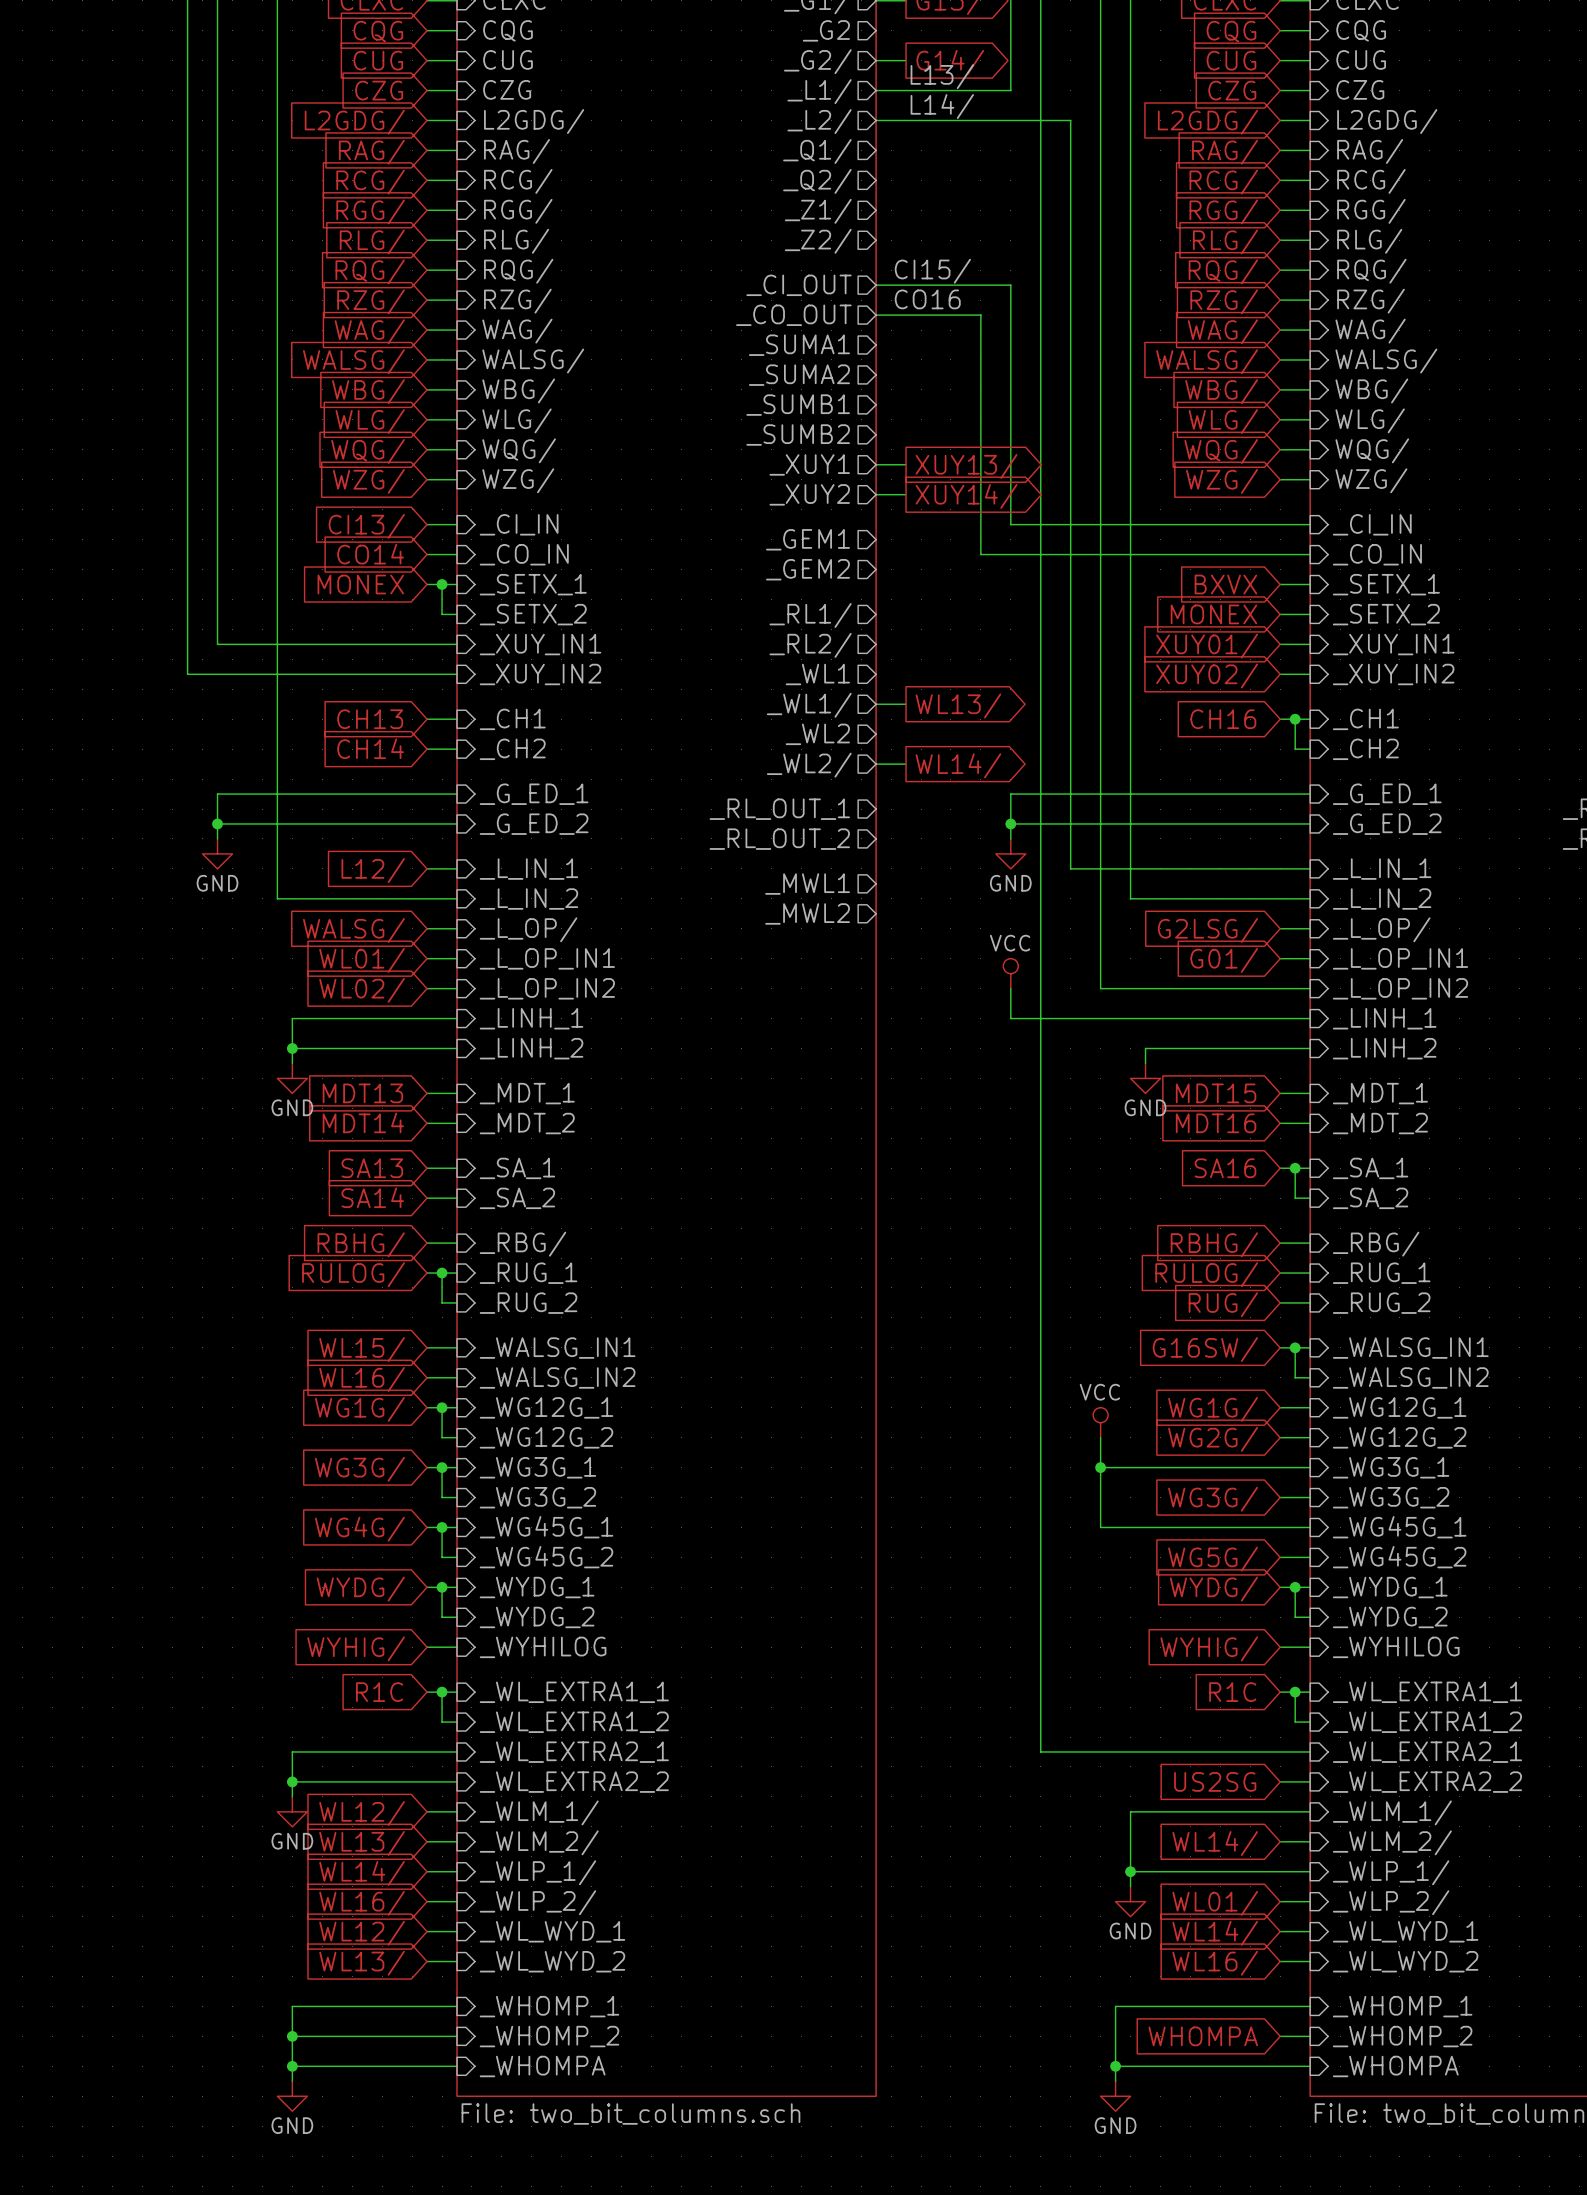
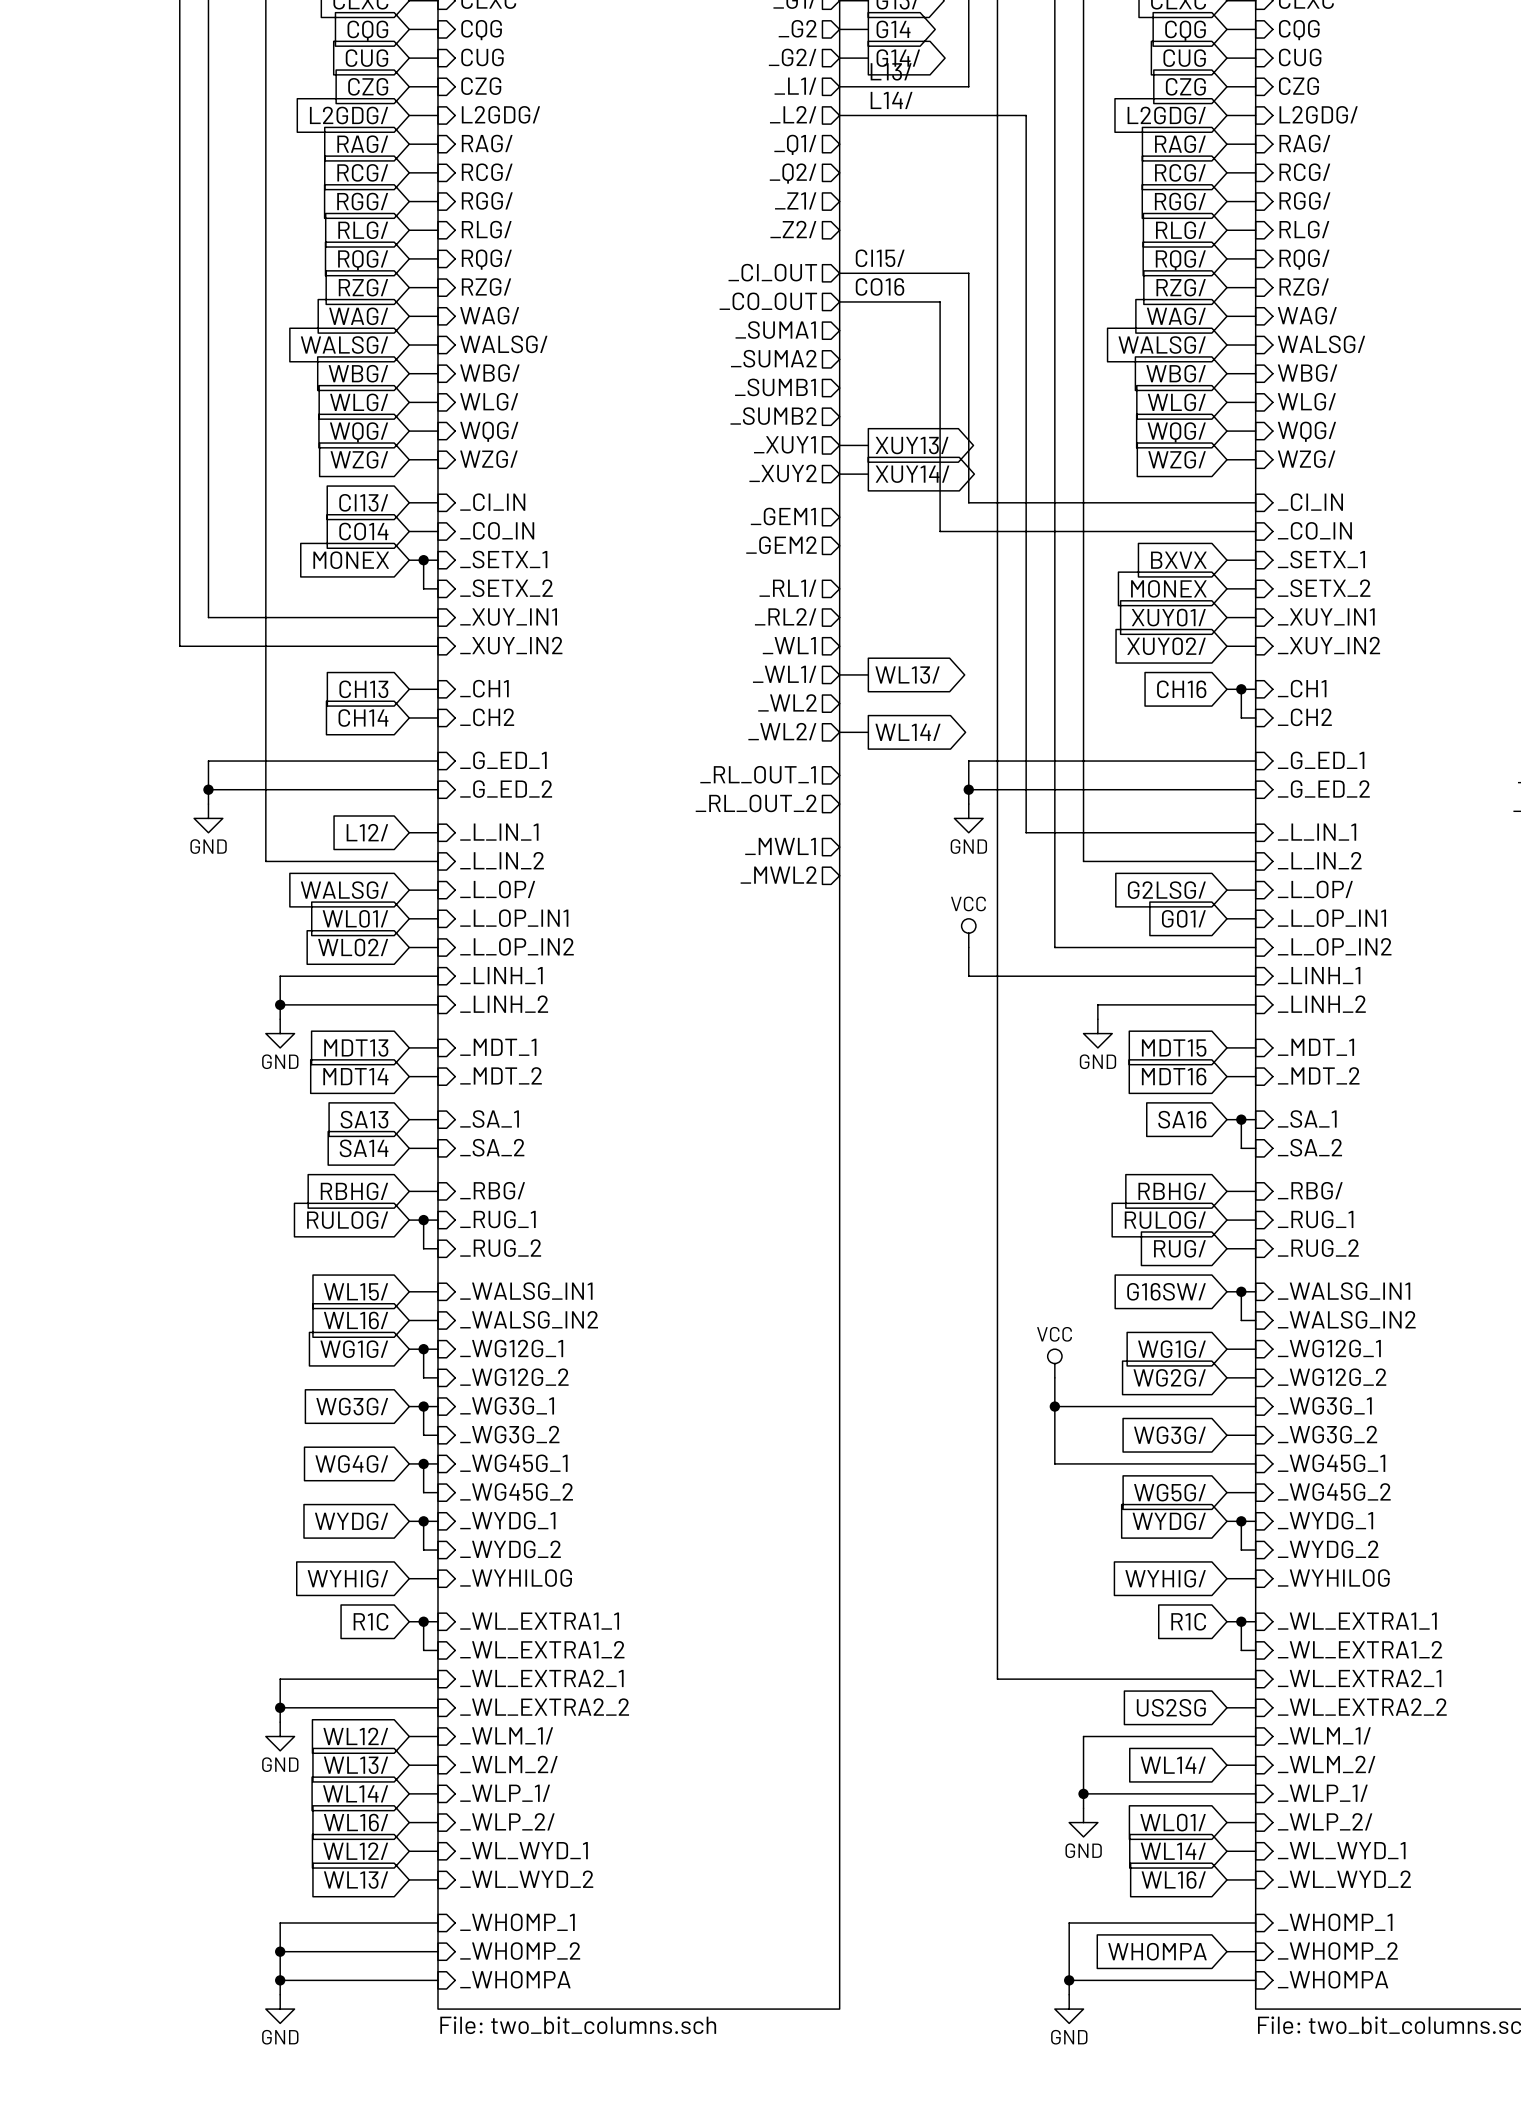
wire: none -> (839, 29) (868, 29)
global label: none -> G14 (893, 29)

